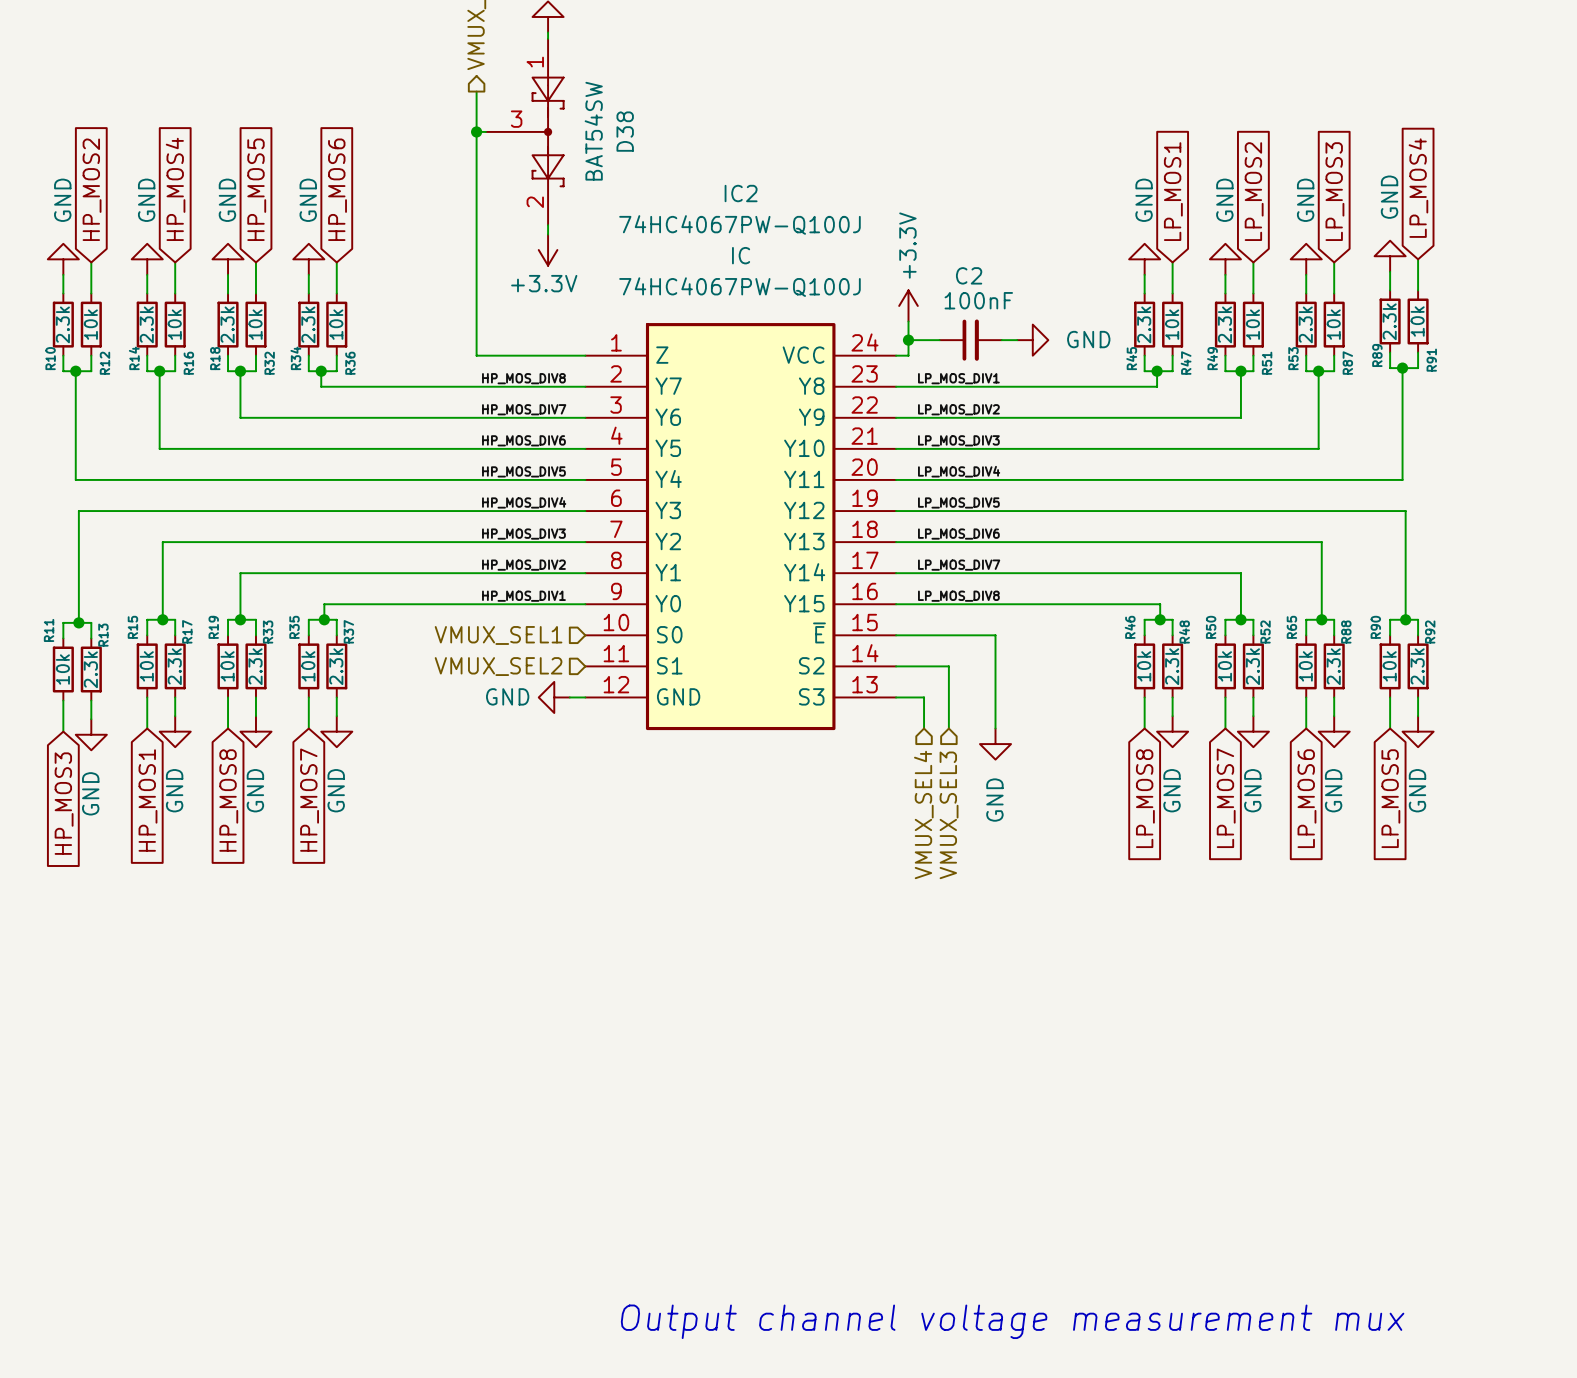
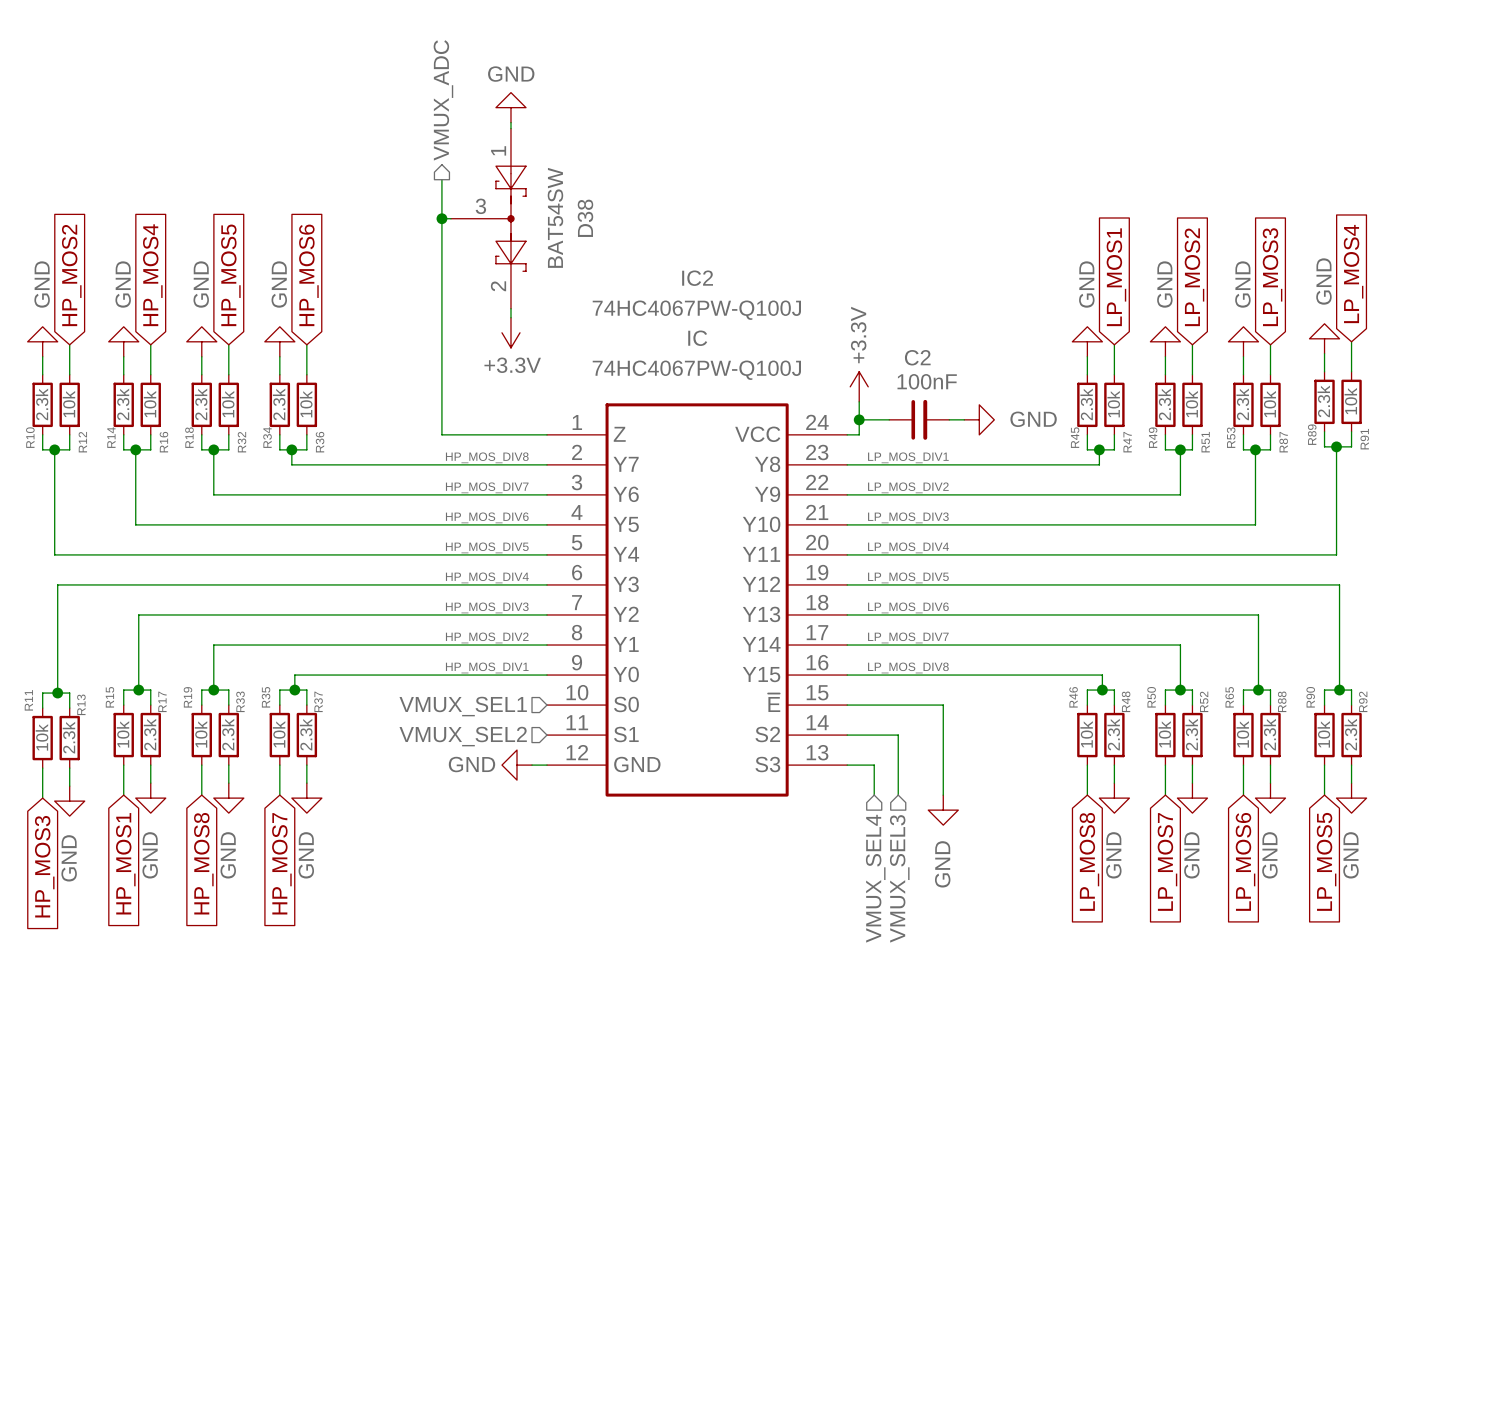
text: Output channel voltage measurement mux (1012, 1321) -> none

